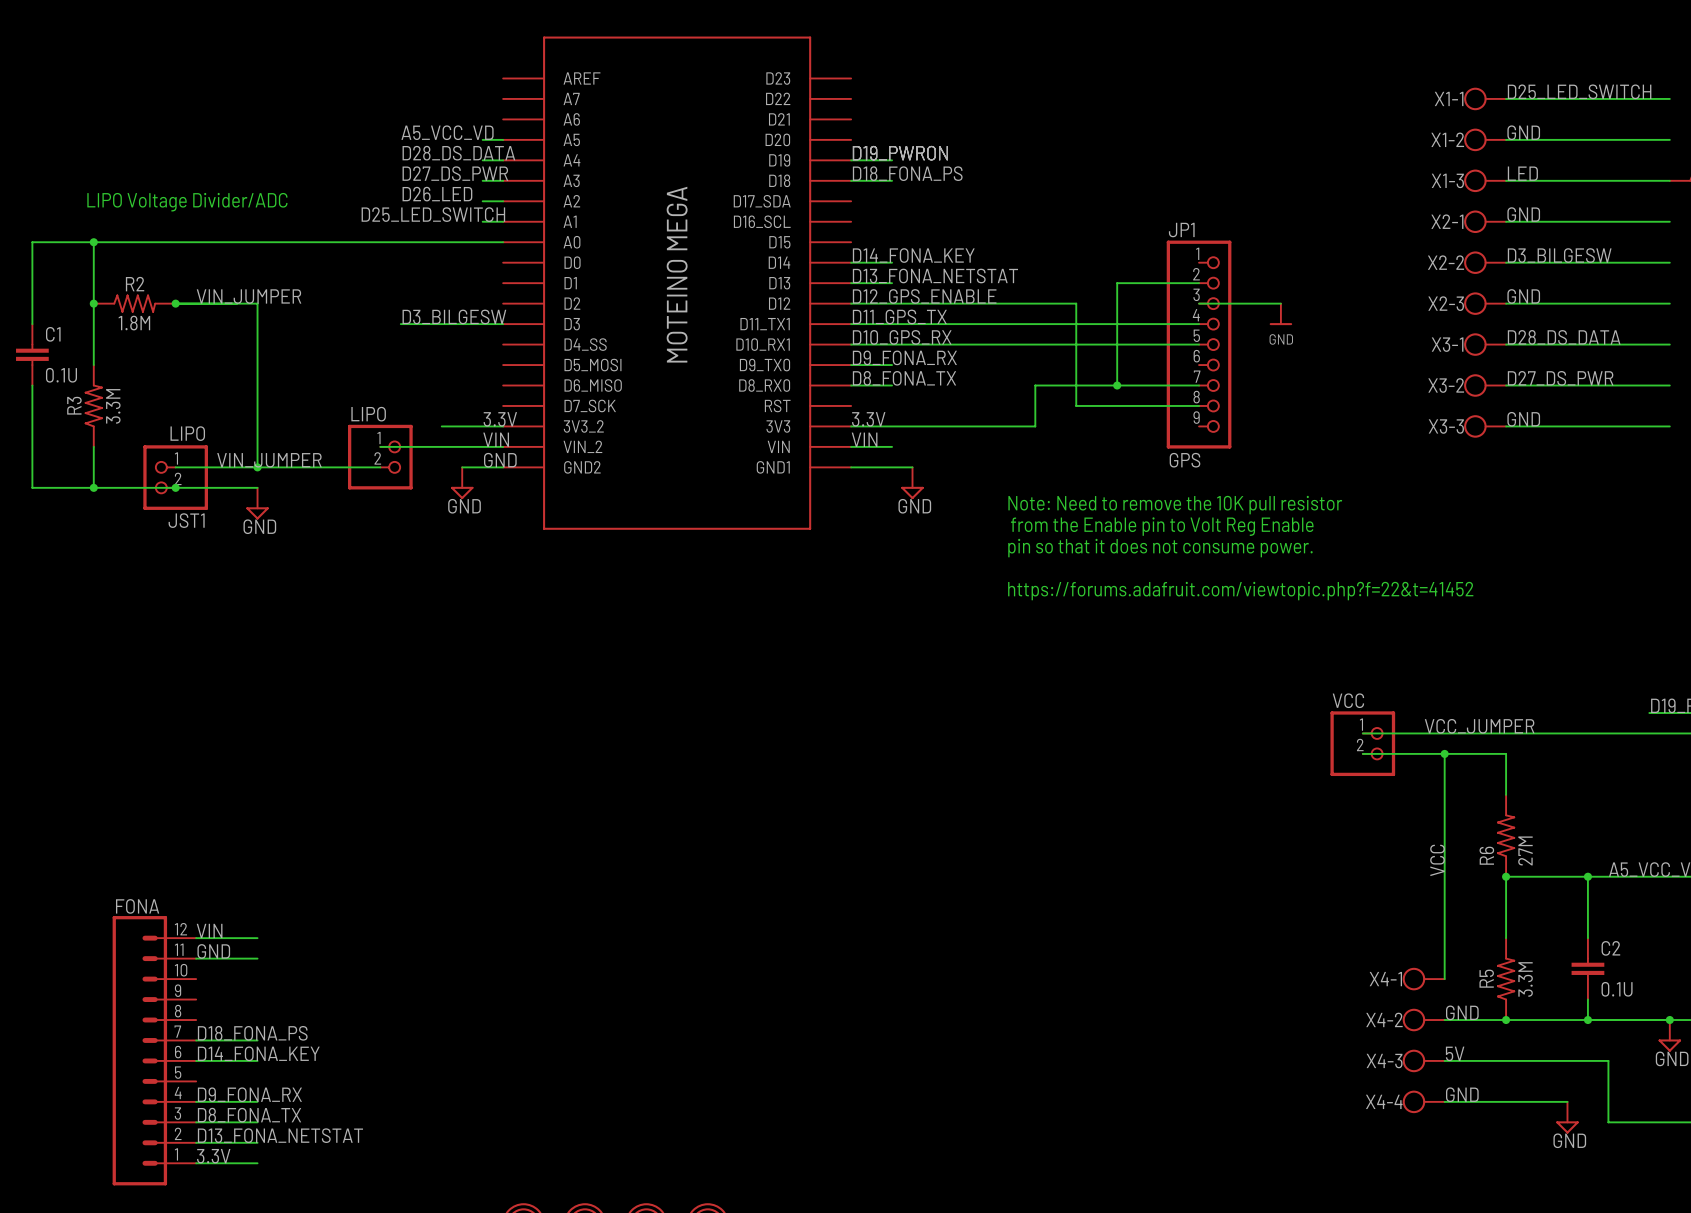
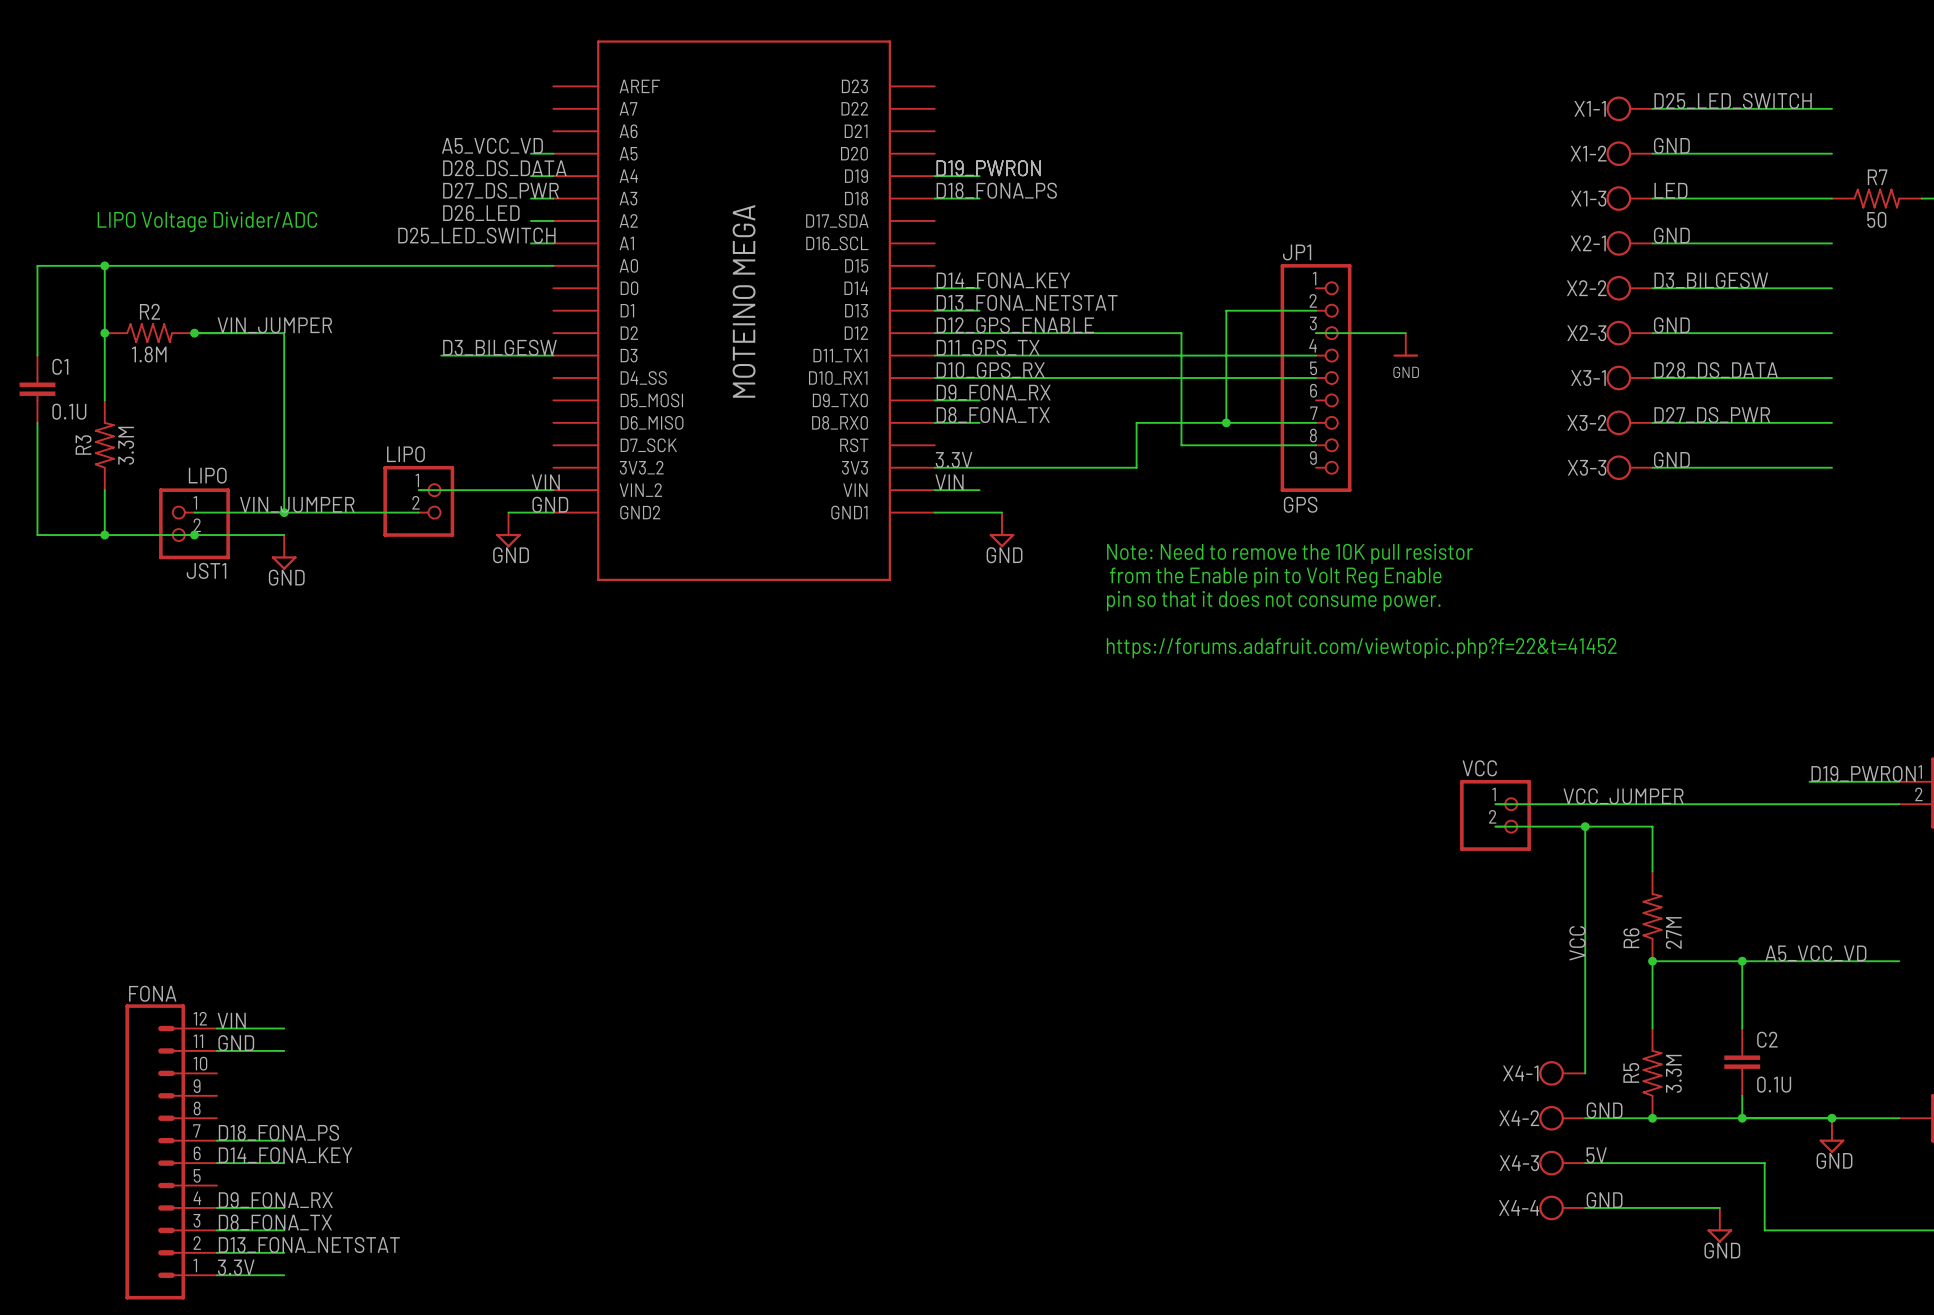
label: 3.3V (500, 419) -> none
wire: (441, 426) (503, 426) -> none

